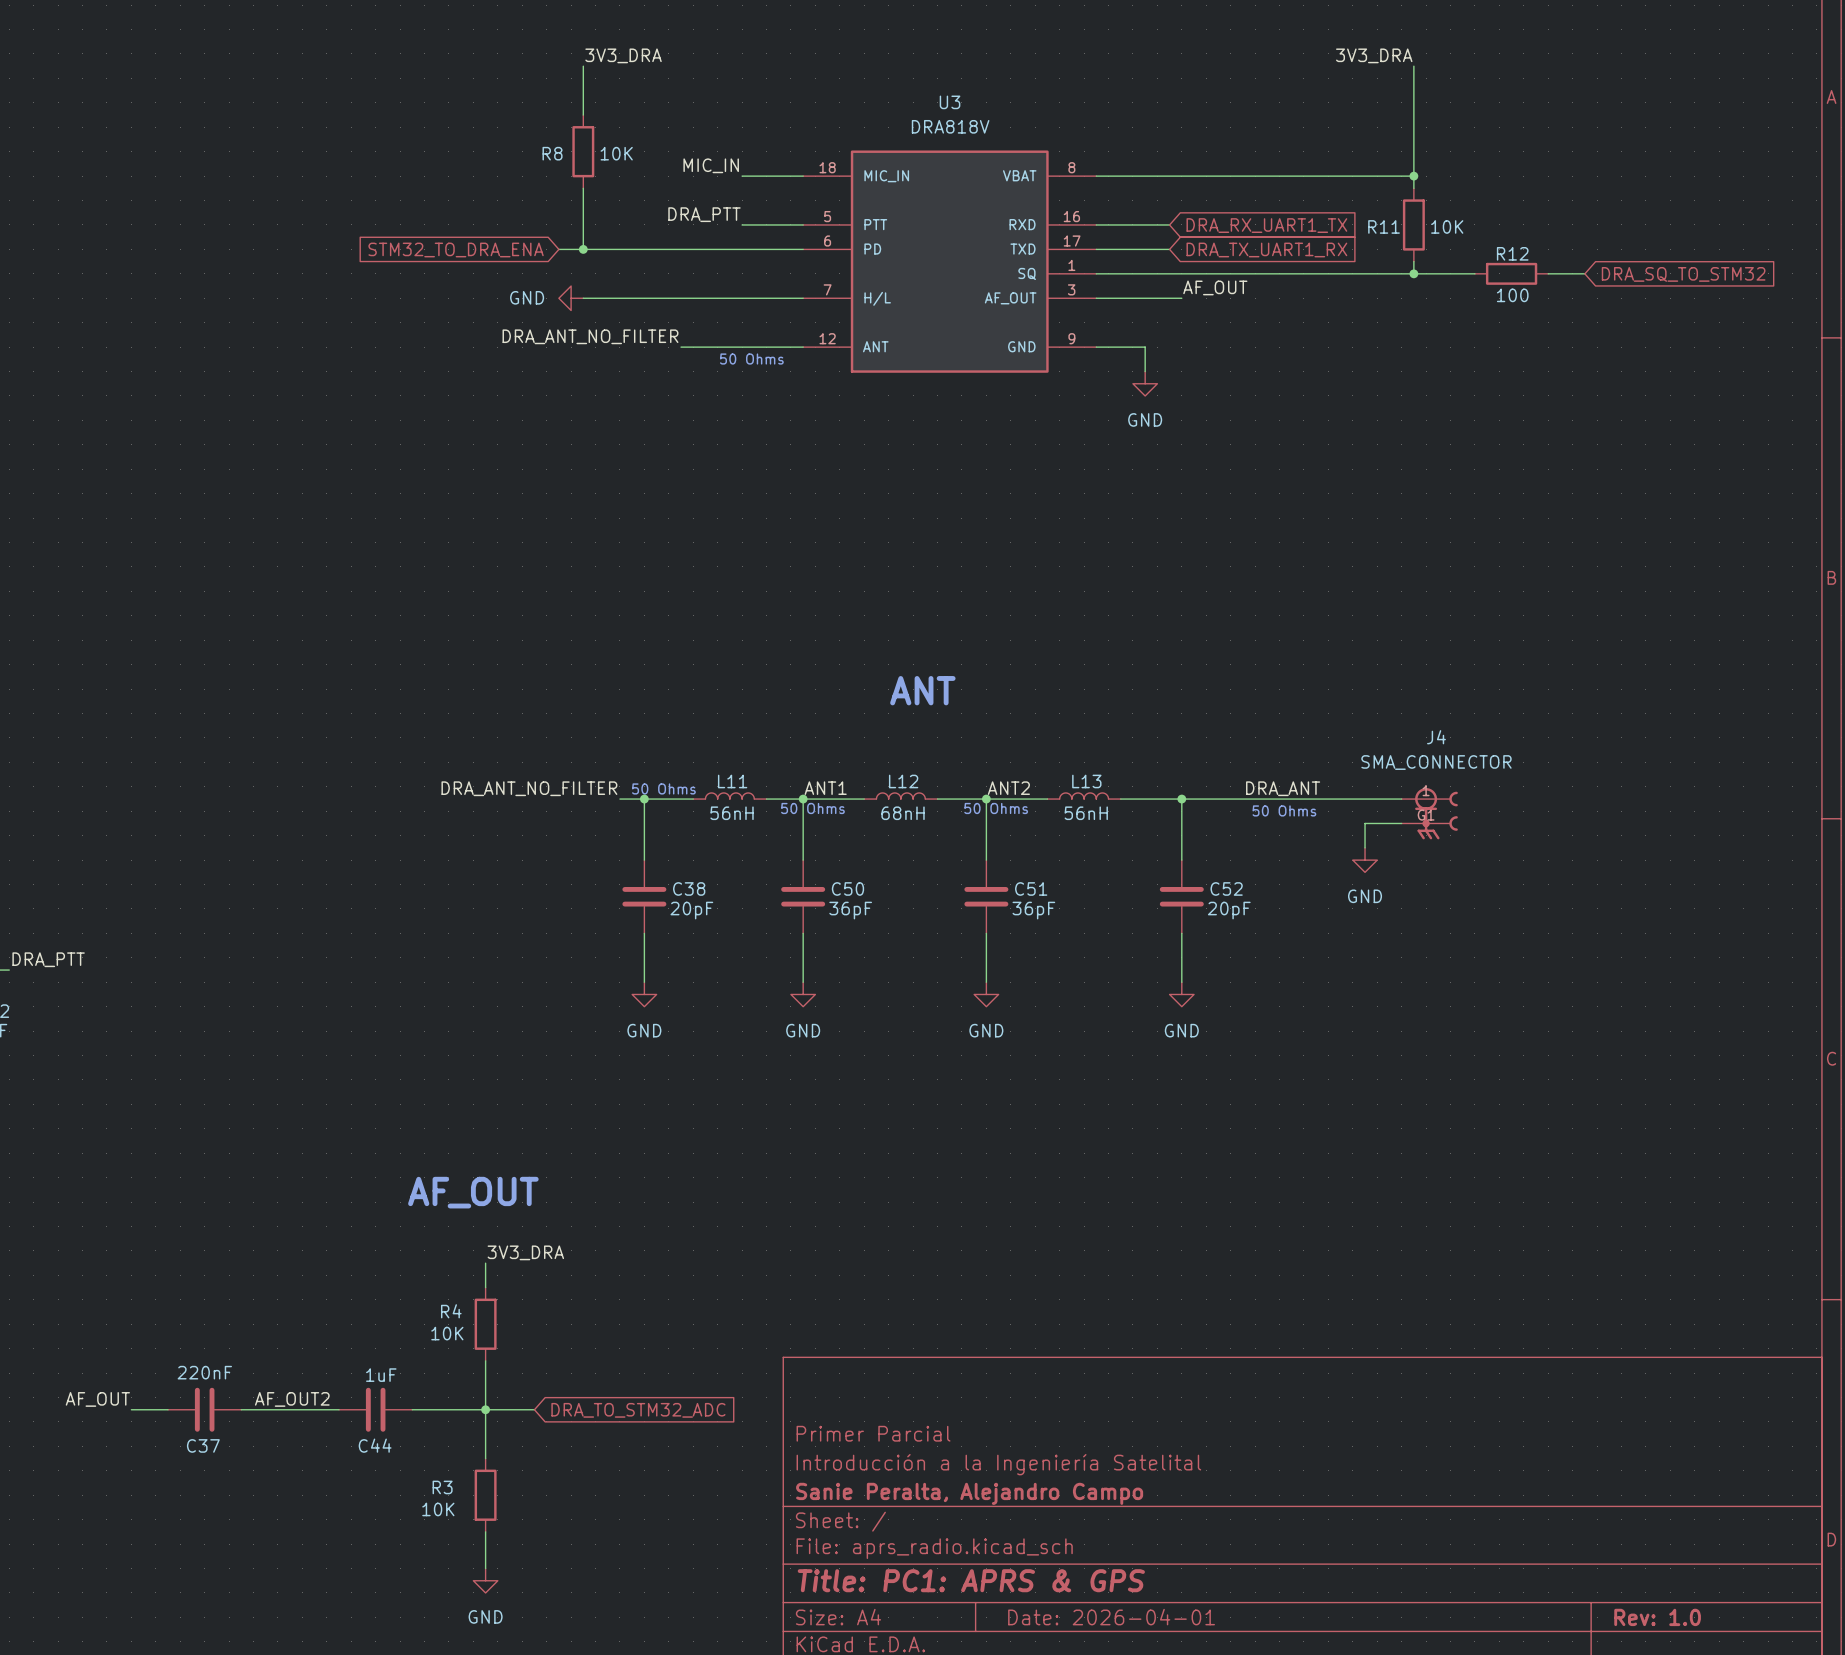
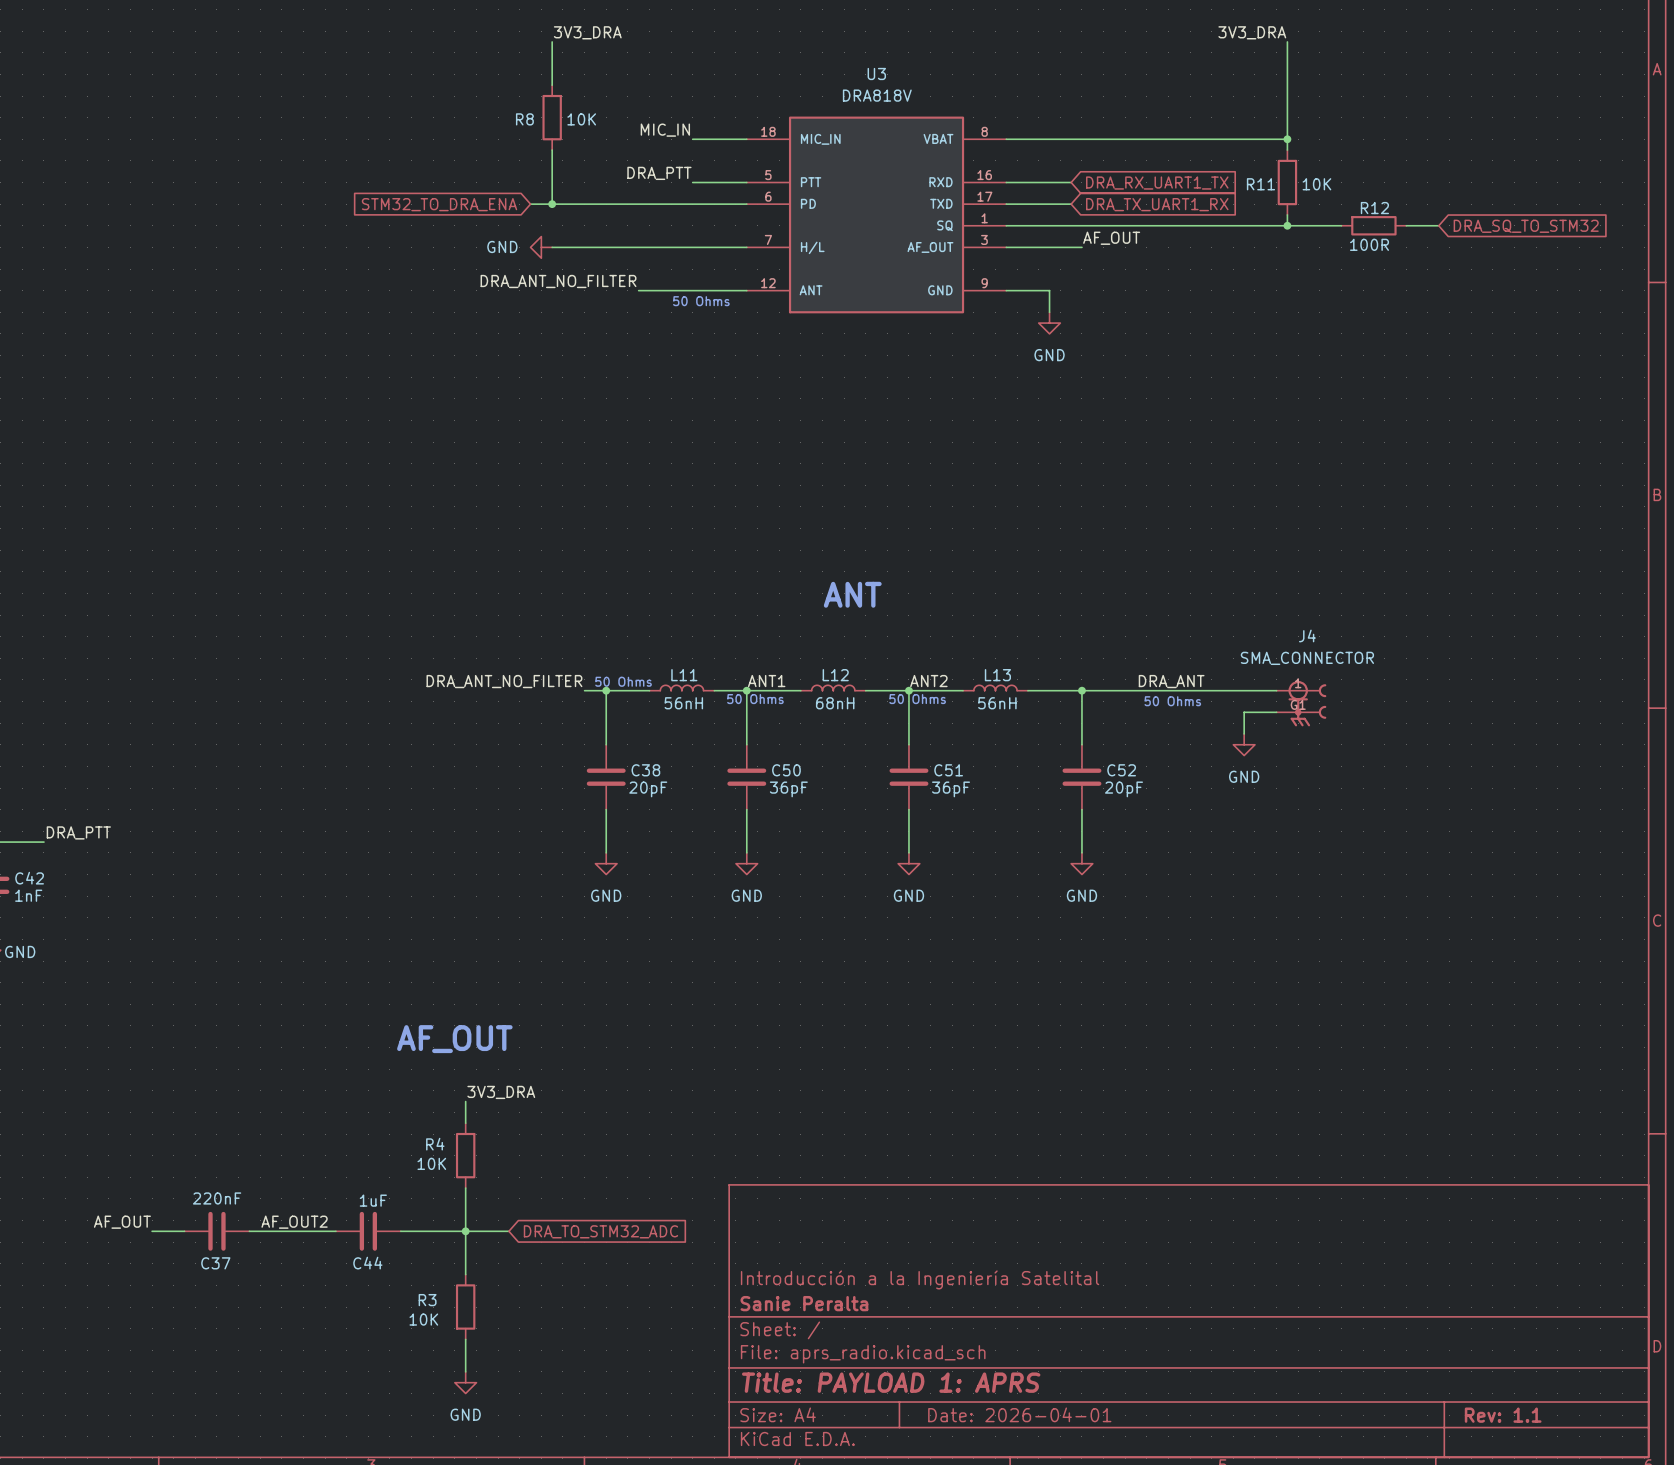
R12 value: 100 (1512, 295) -> 100R (1369, 244)
title block: Primer Parcial (873, 1433) -> none
title block: Sanie Peralta, Alejandro Campo (969, 1493) -> Sanie Peralta (804, 1303)
title block: Title: PC1: APRS & GPS (971, 1580) -> Title: PAYLOAD 1: APRS (891, 1382)
title block: Rev: 1.0 (1657, 1617) -> Rev: 1.1 (1503, 1415)

